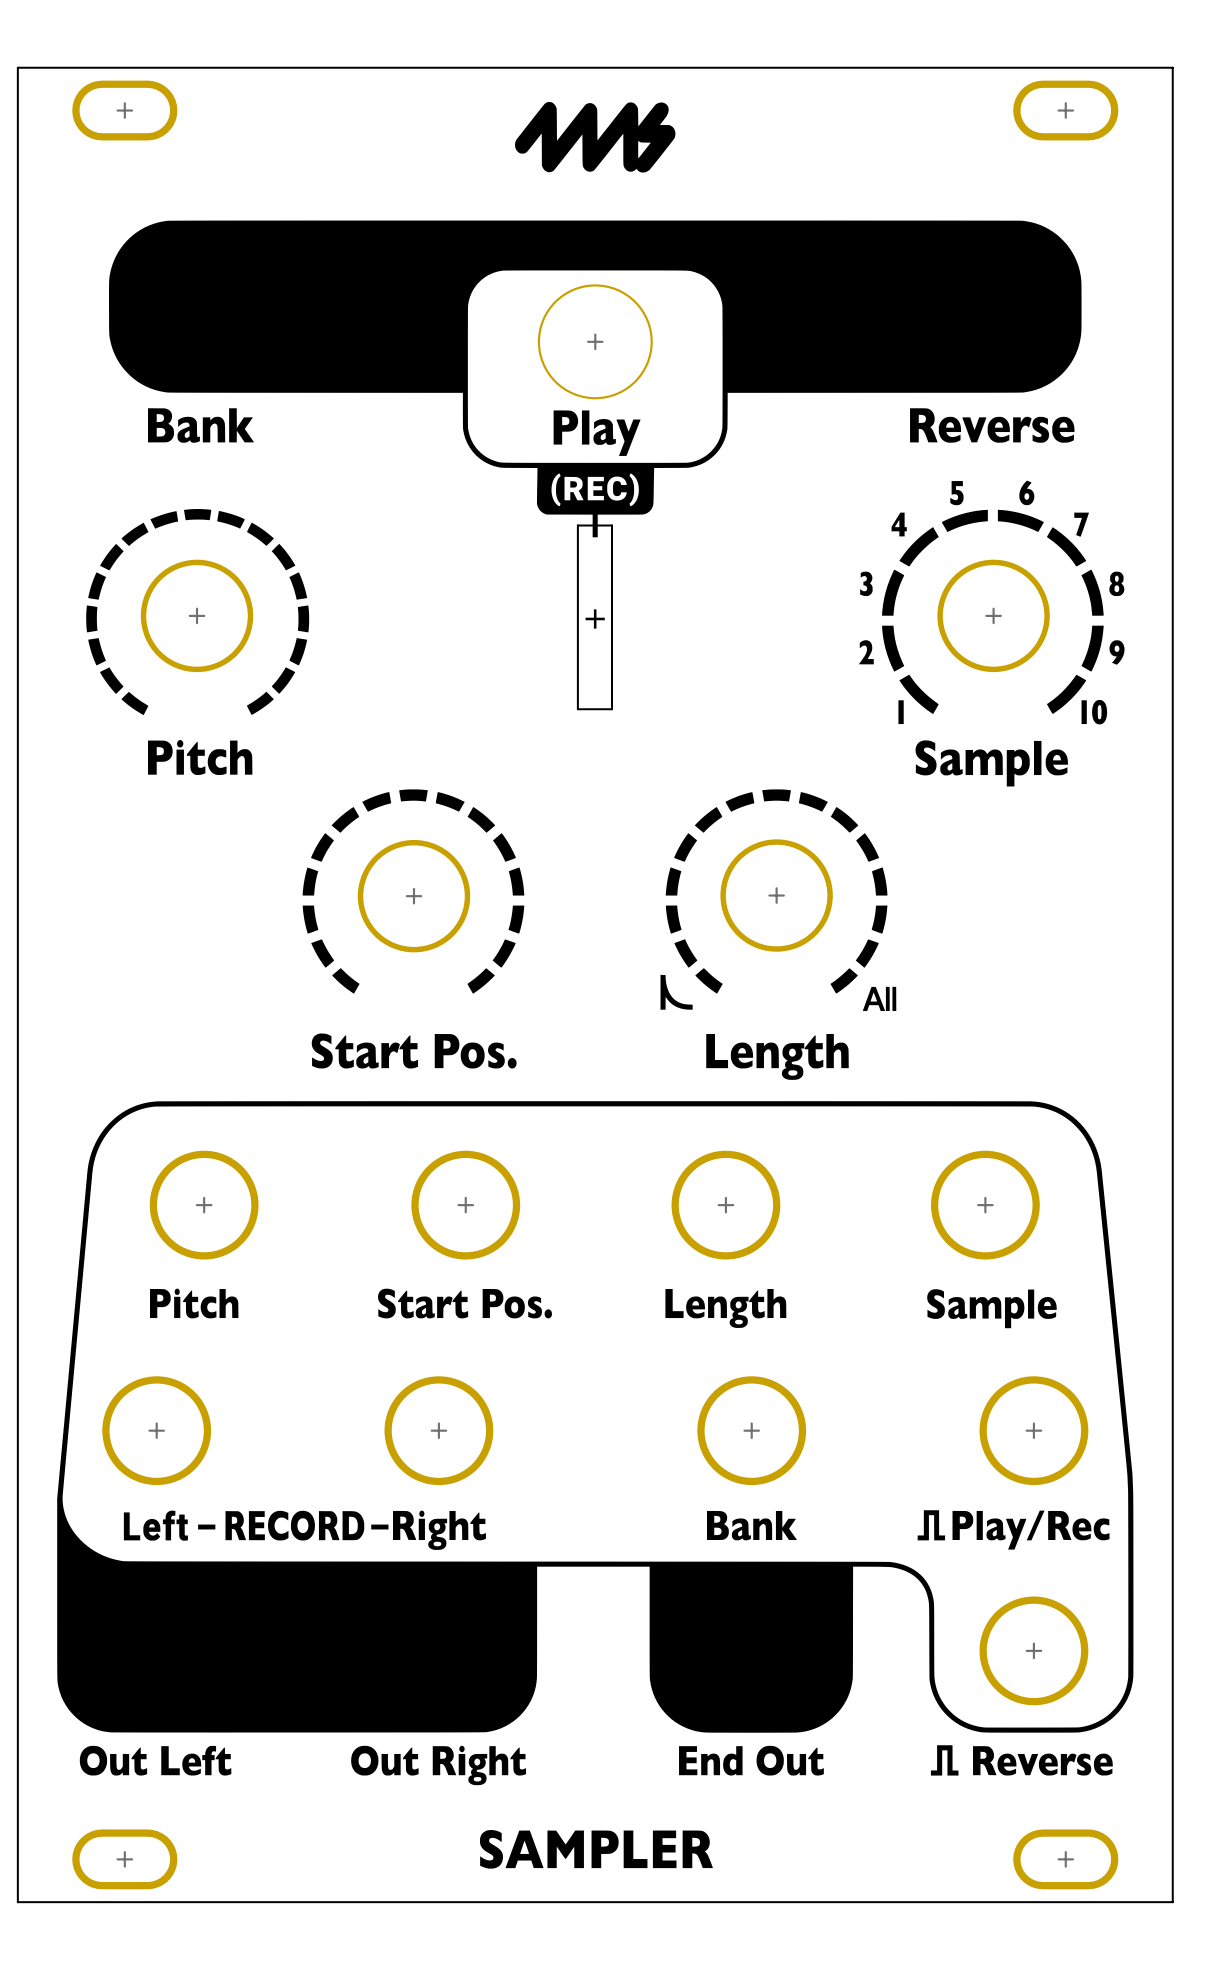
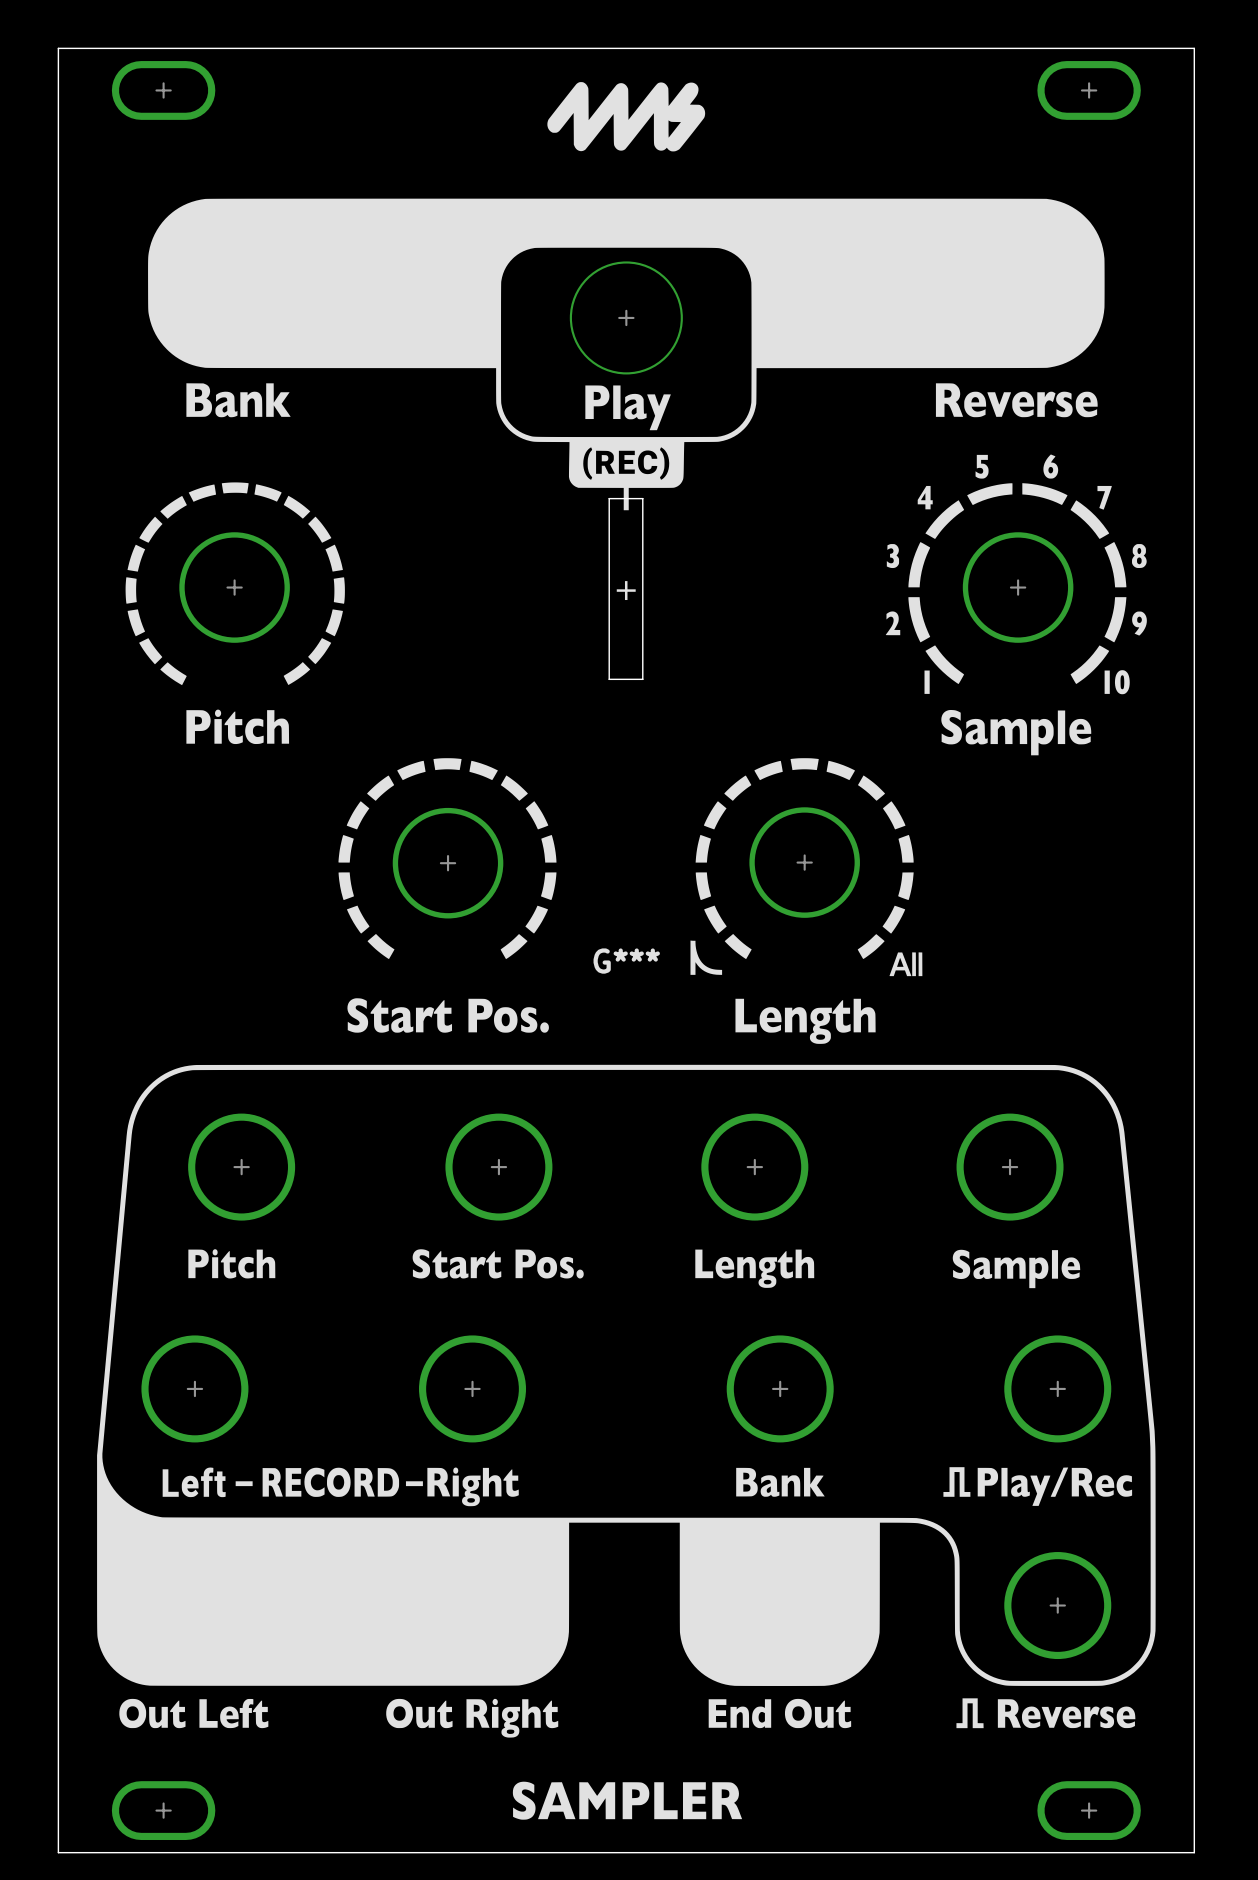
G***: none -> (626, 950)

